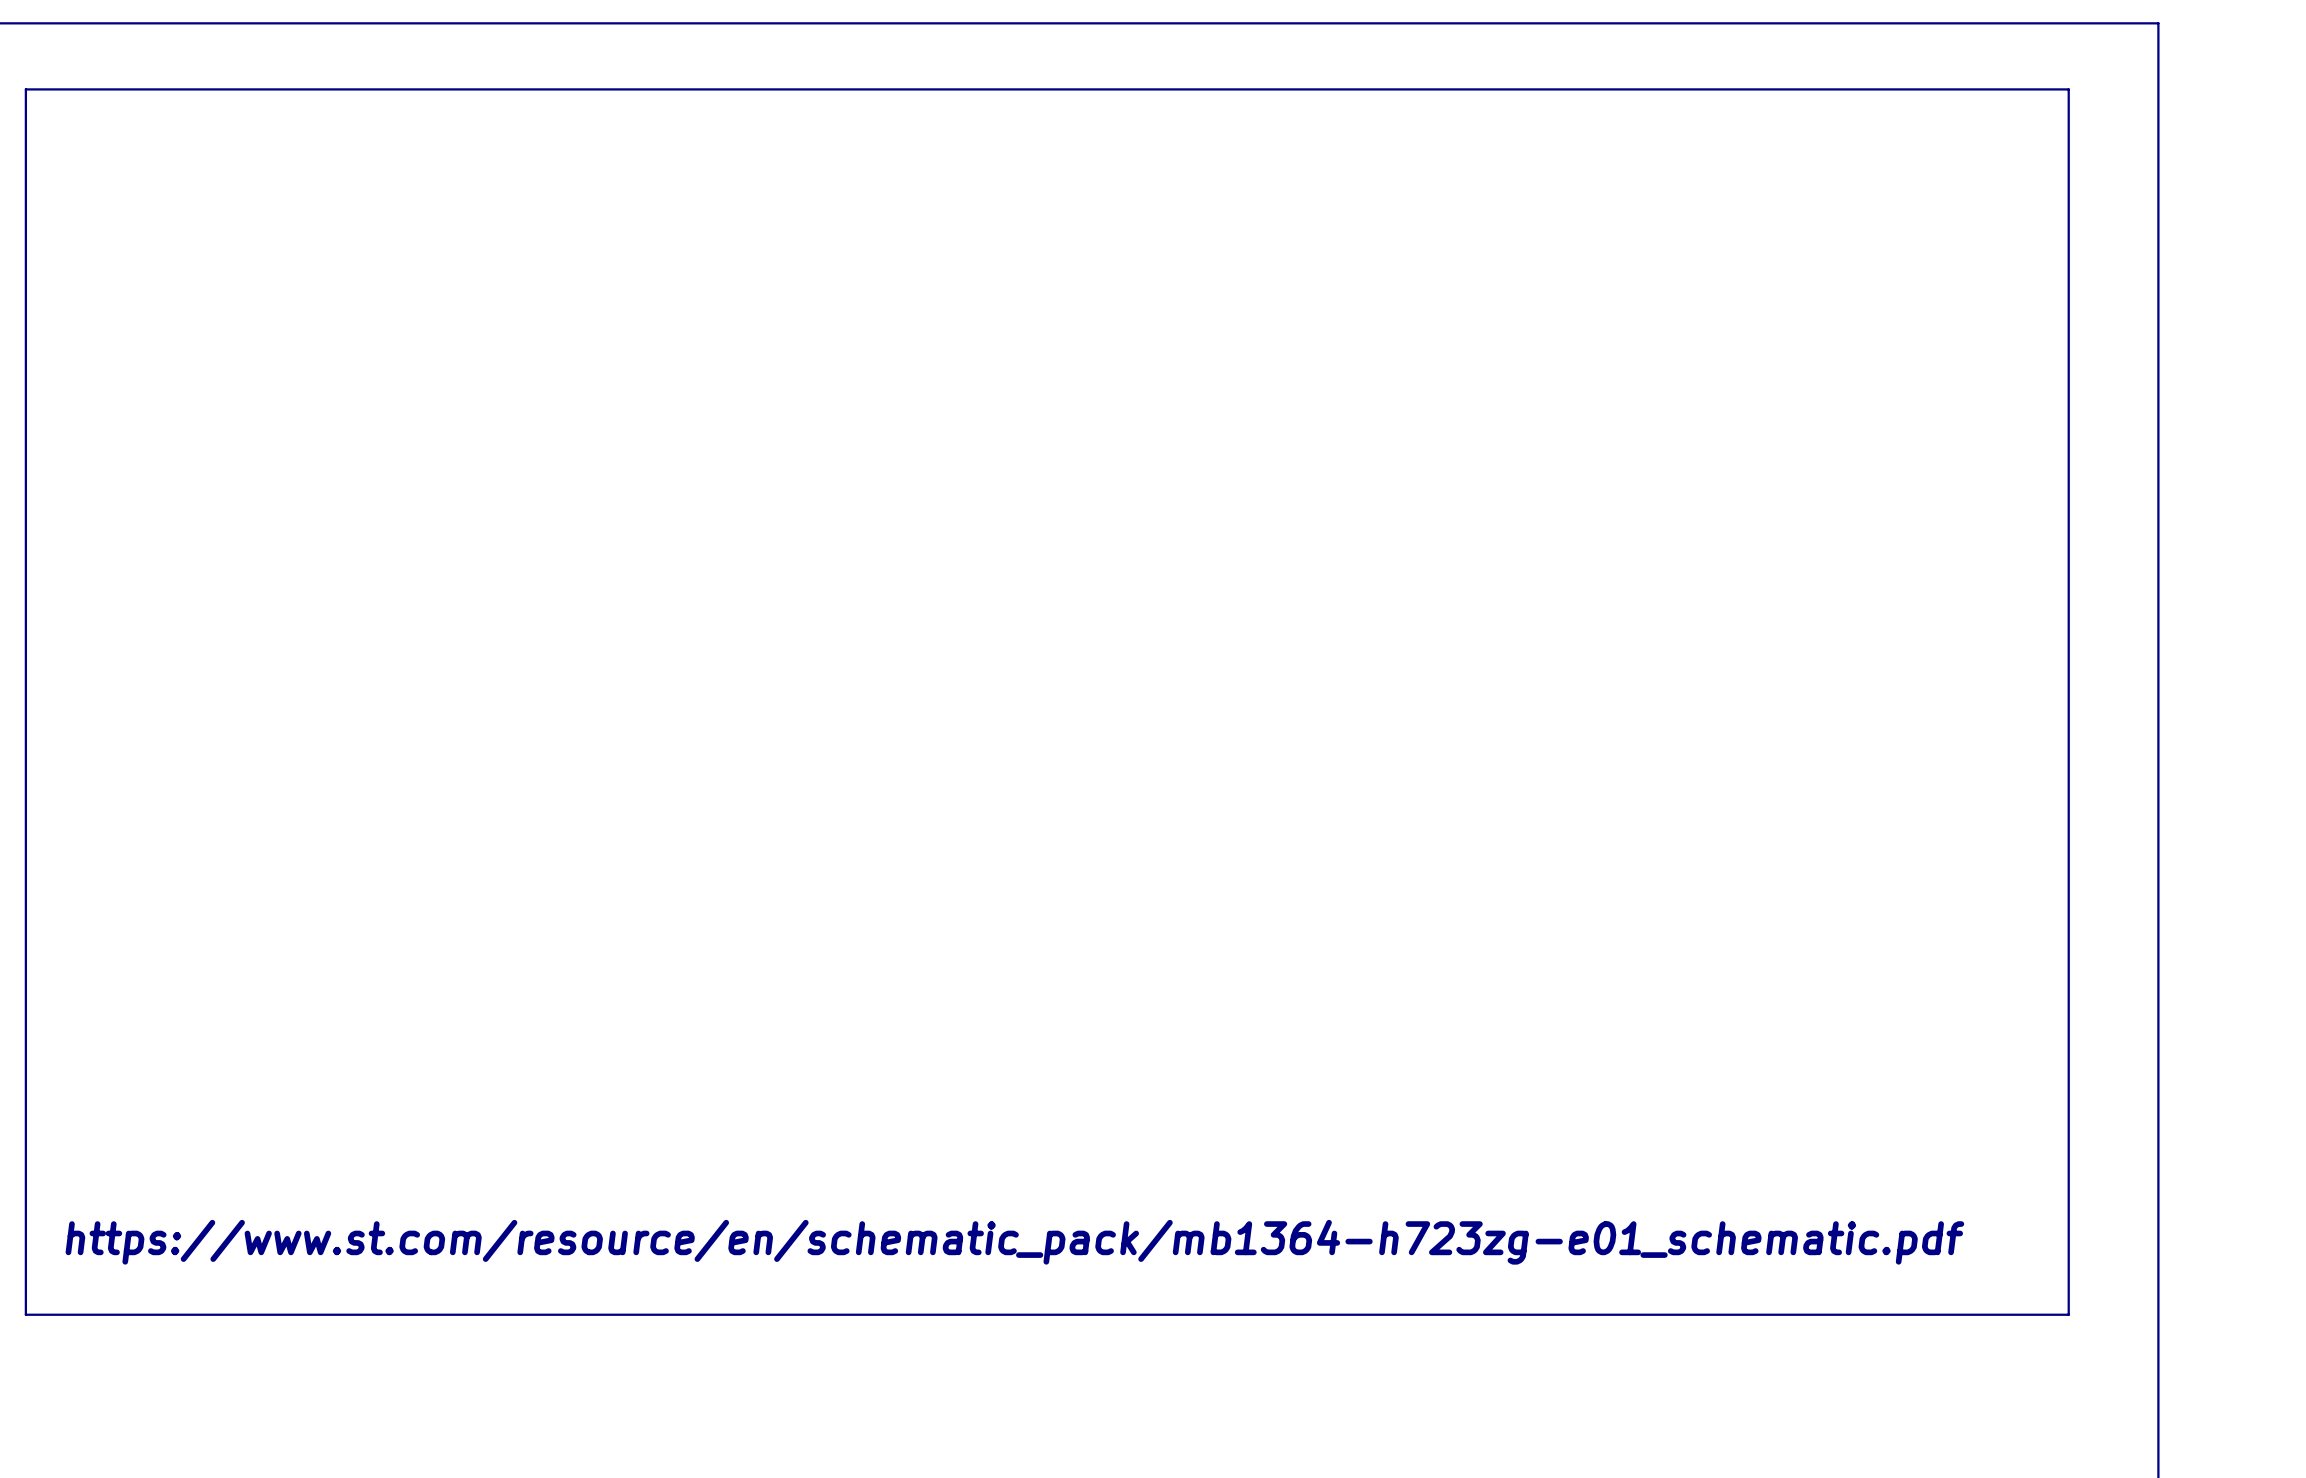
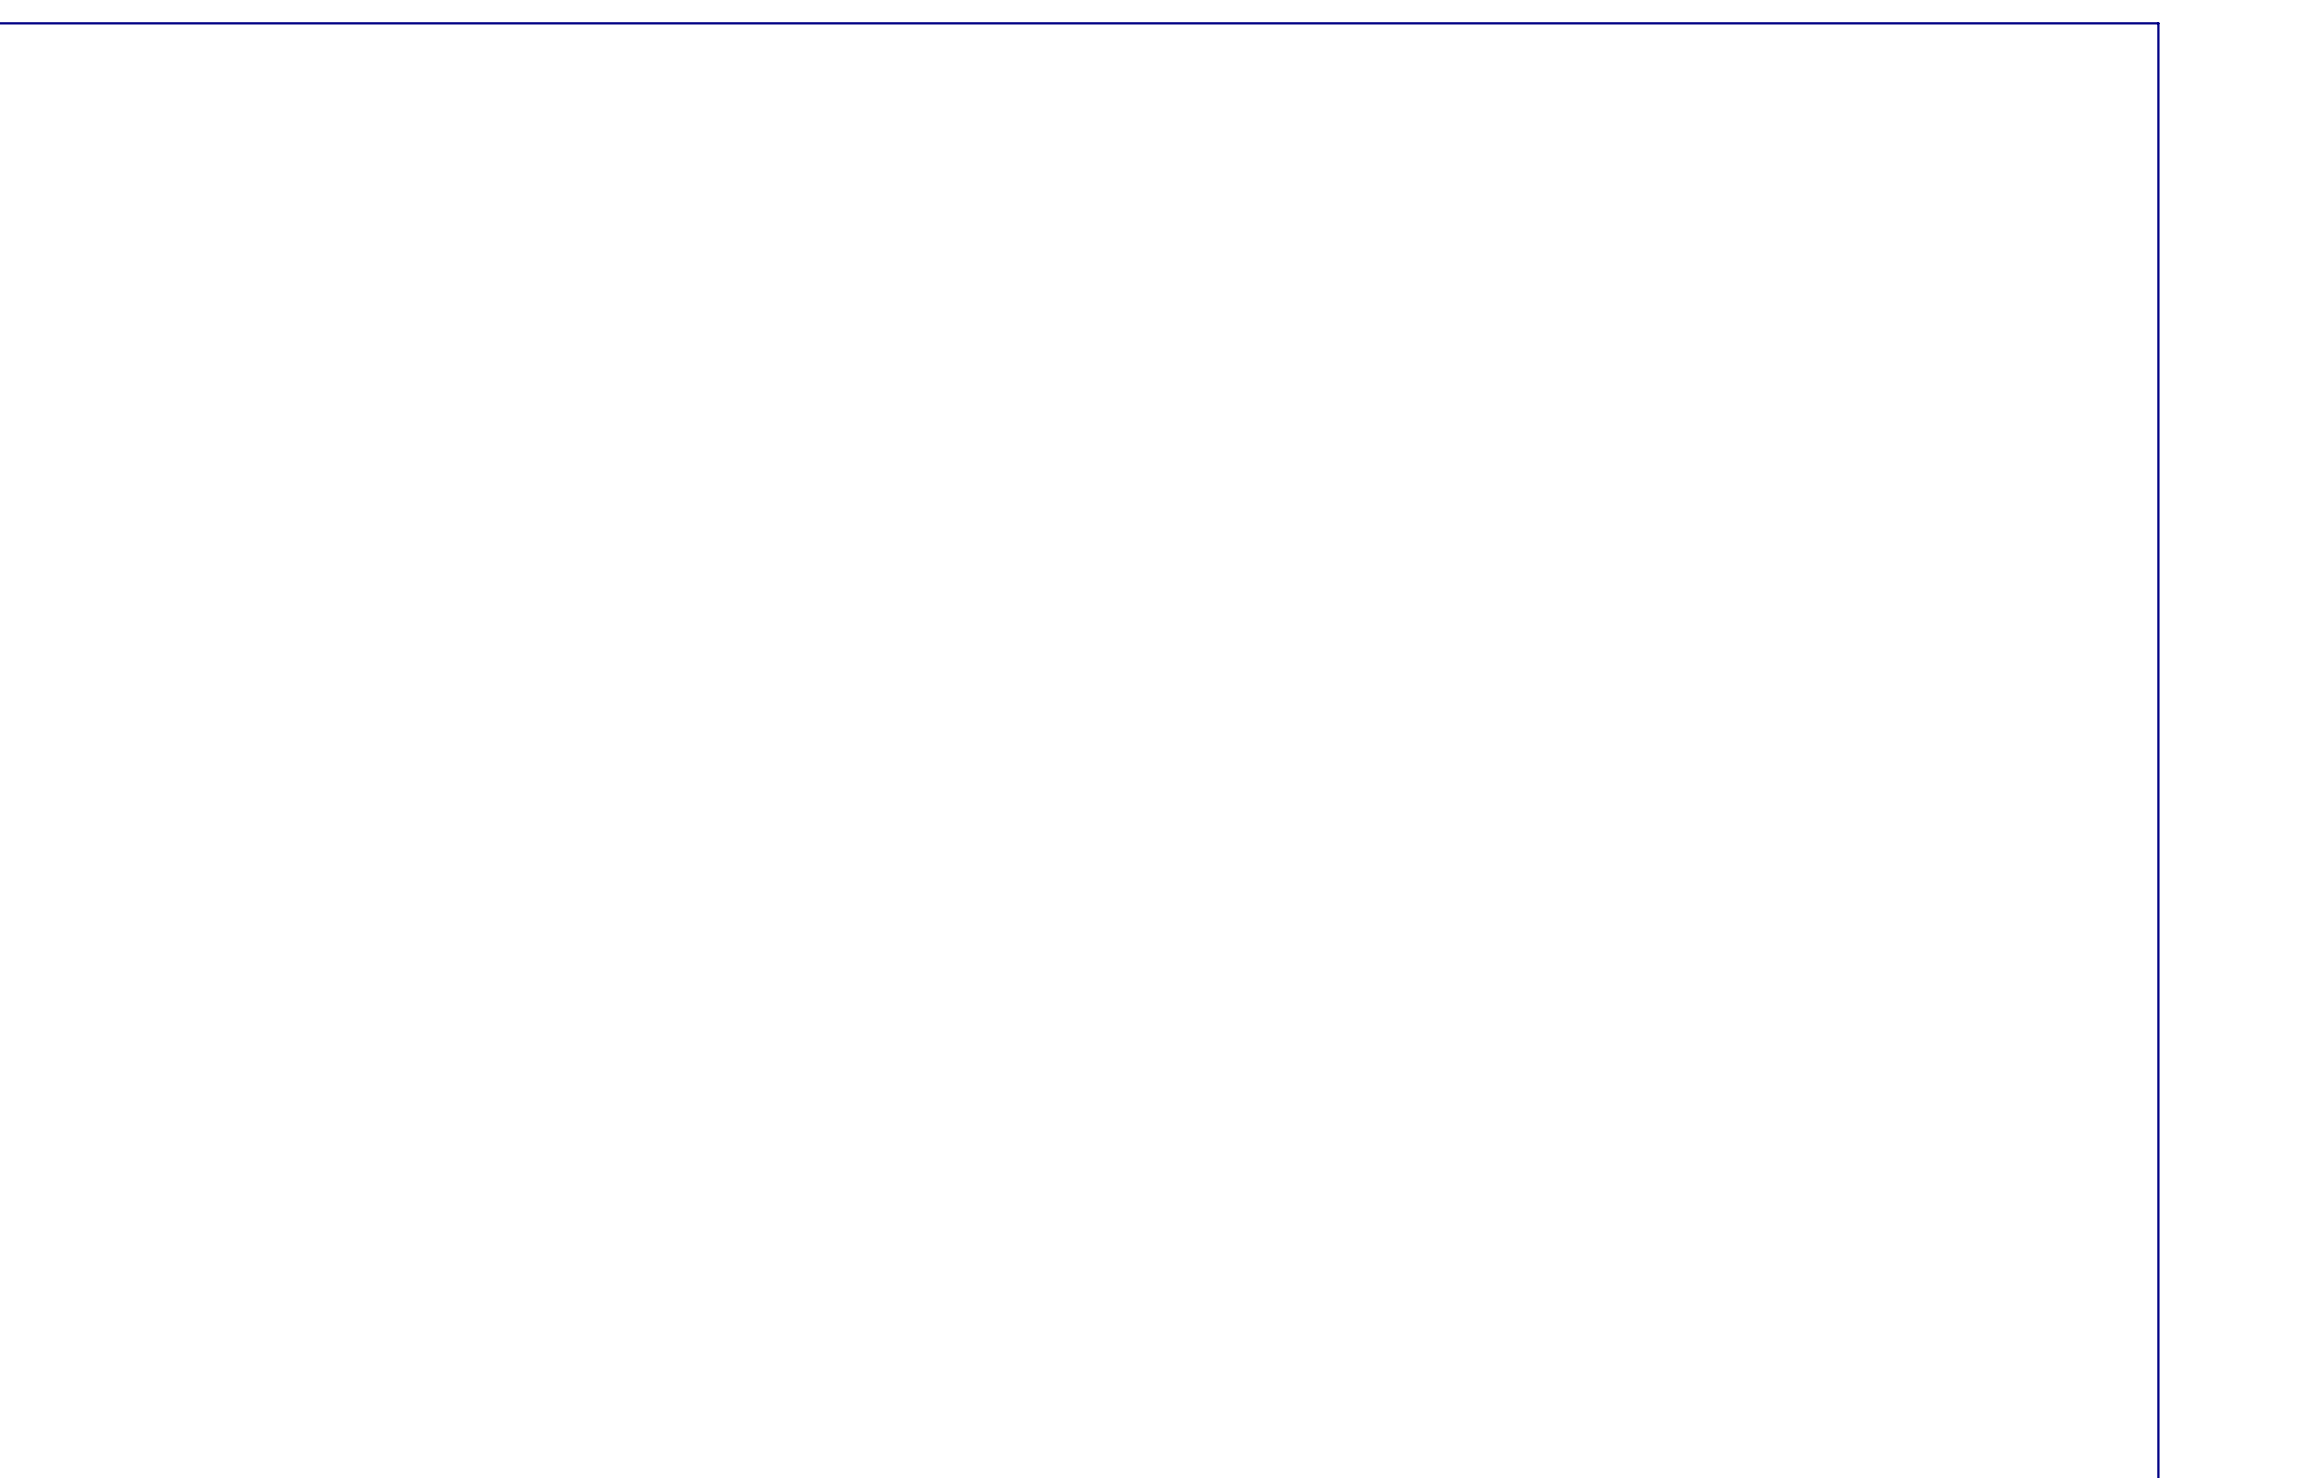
line: (25, 89) (2068, 89) (2068, 1314) (25, 1314) (25, 89) -> none
text: https://www.st.com/resource/en/schematic_pack/mb1364-h723zg-e01_schematic.pdf (1014, 1242) -> none

